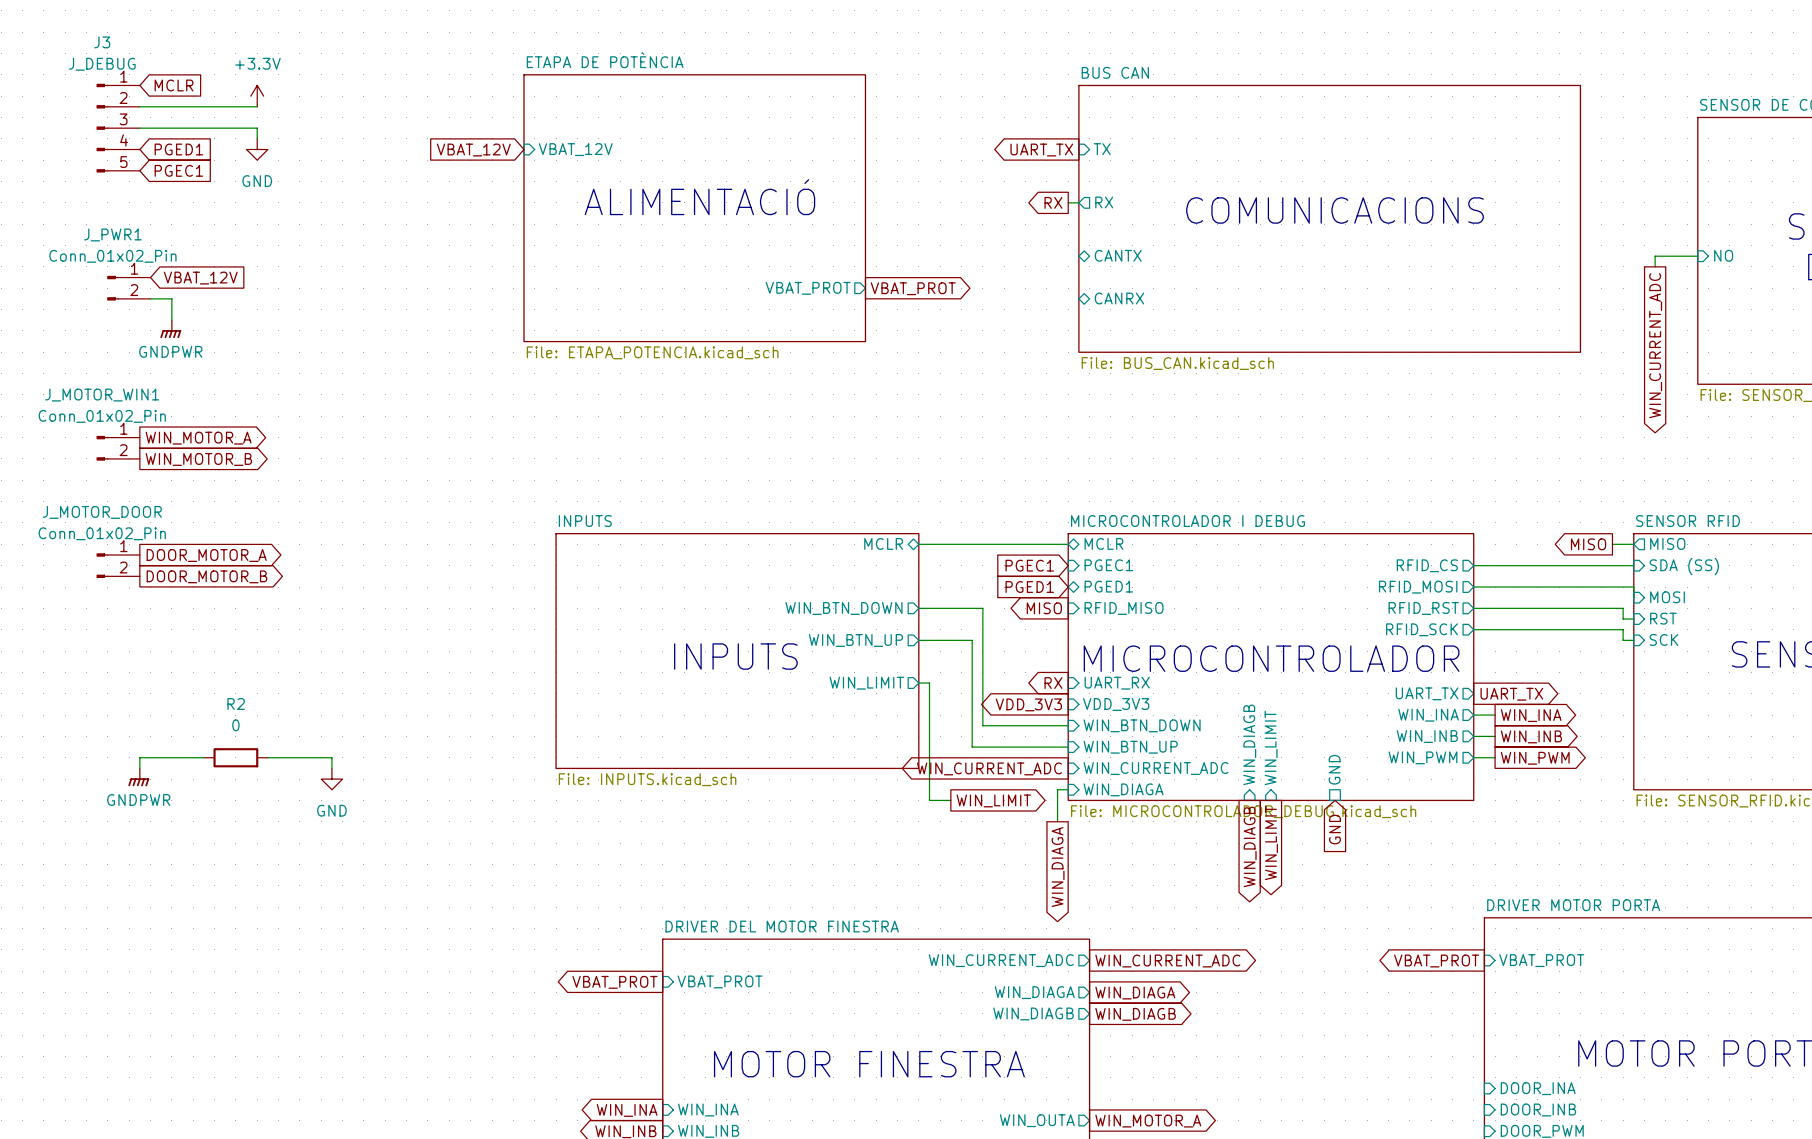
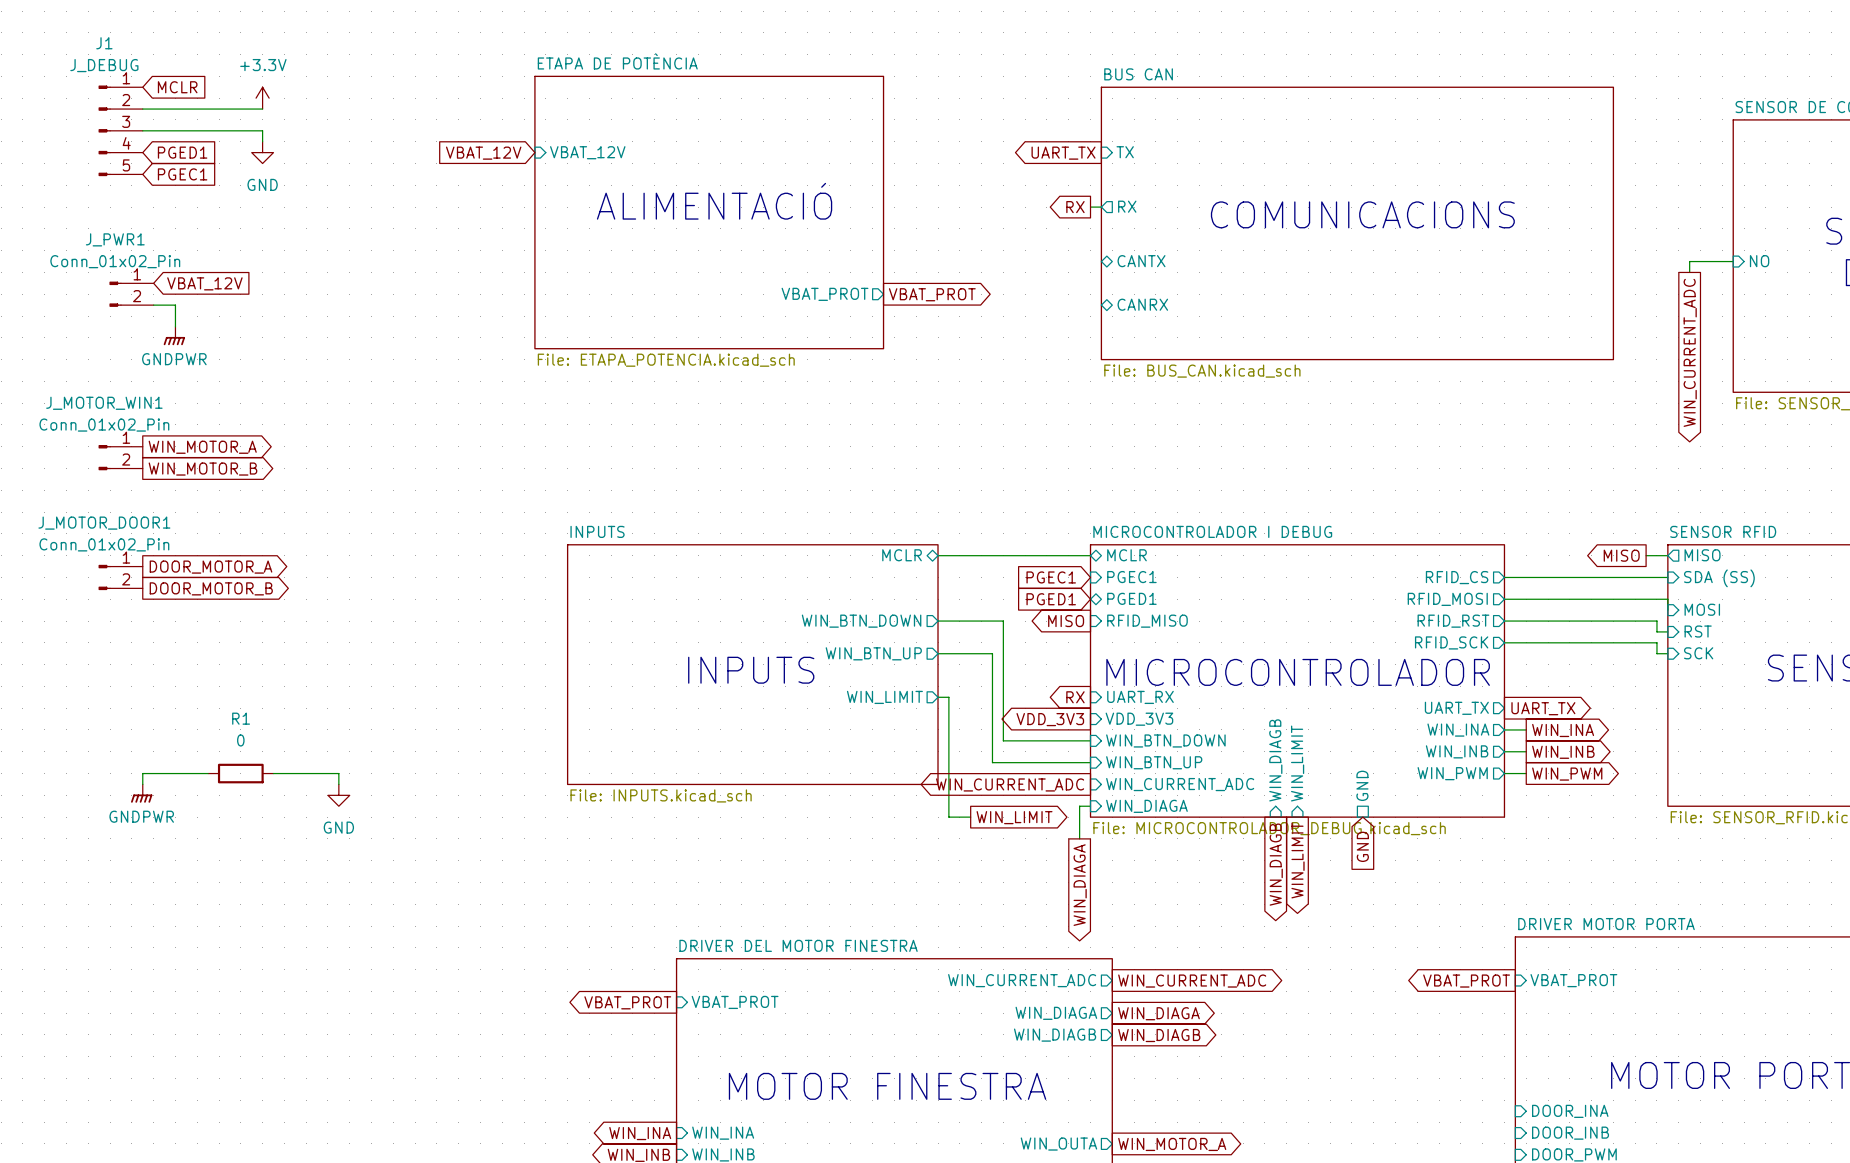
J3 name: J3 (102, 42) -> J1 (104, 43)
J_MOTOR_DOOR name: J_MOTOR_DOOR (102, 512) -> J_MOTOR_DOOR1 (104, 523)
R2 name: R2 (236, 703) -> R1 (241, 718)

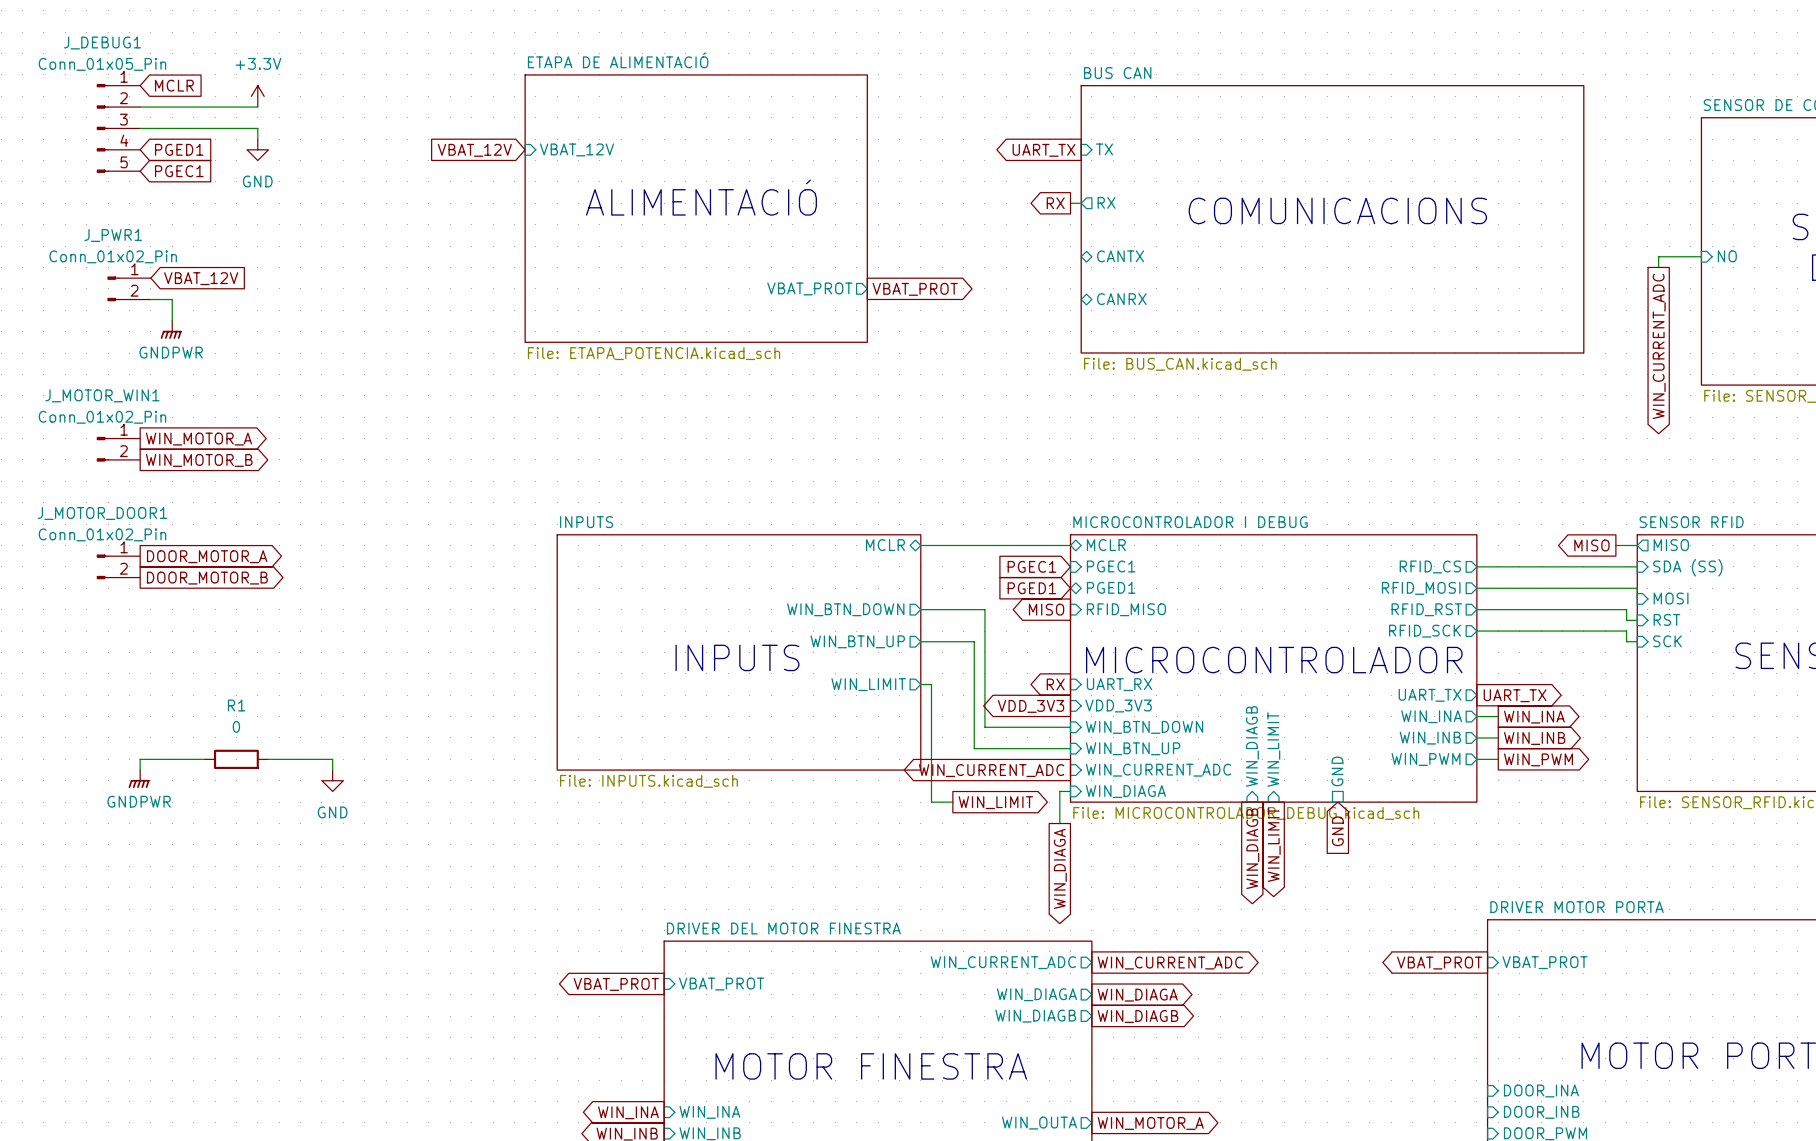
J1 name: J1 (104, 43) -> J_DEBUG1 (102, 42)
sheet ETAPA DE POTÈNCIA name: ETAPA DE POTÈNCIA (617, 61) -> ETAPA DE ALIMENTACIÓ (618, 60)
J1 value: J_DEBUG (104, 65) -> Conn_01x05_Pin (102, 64)

